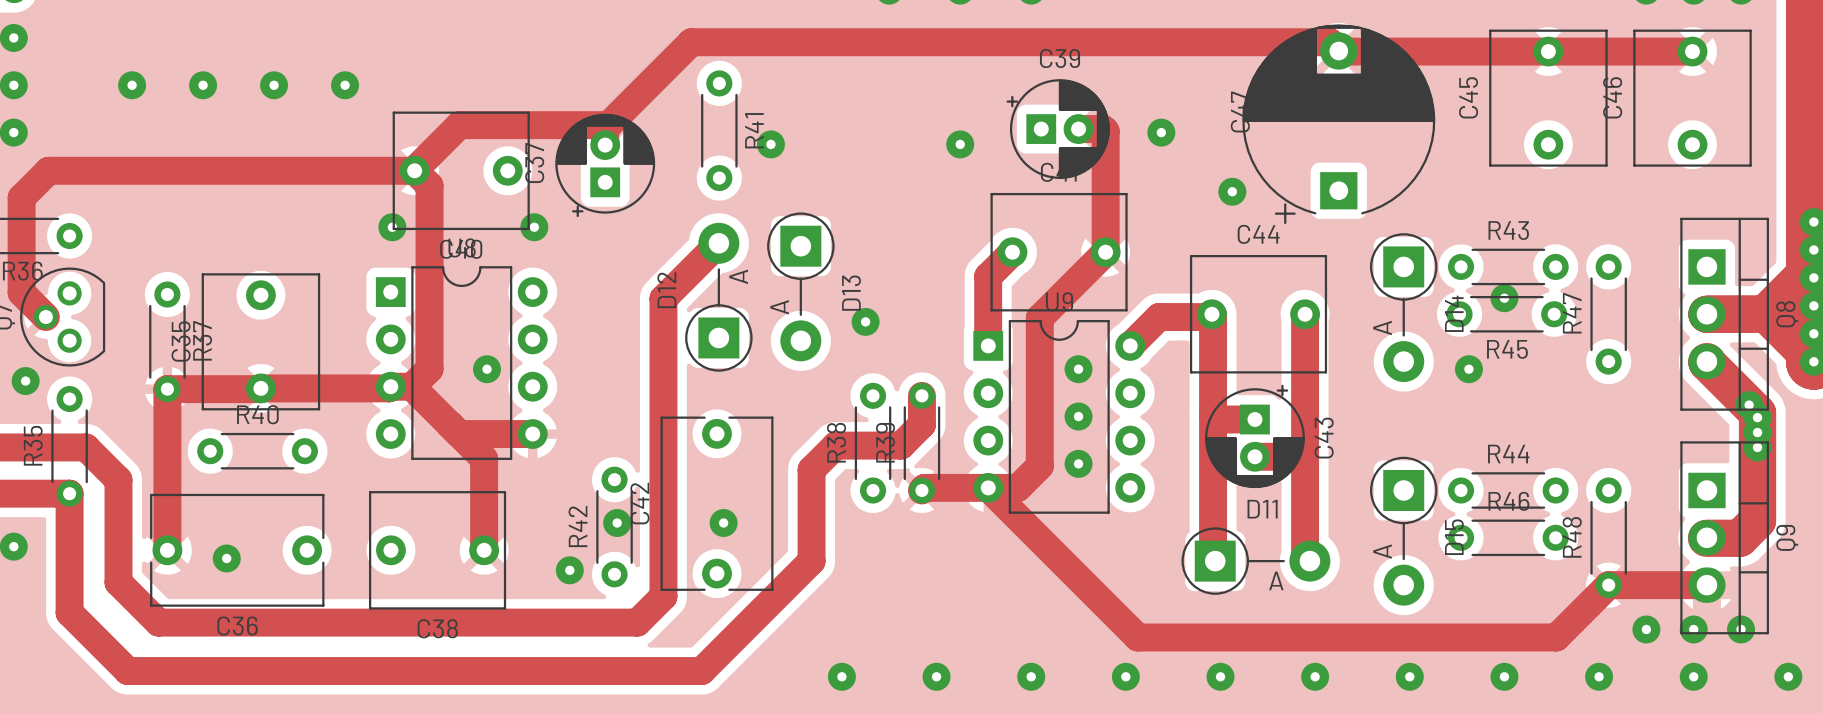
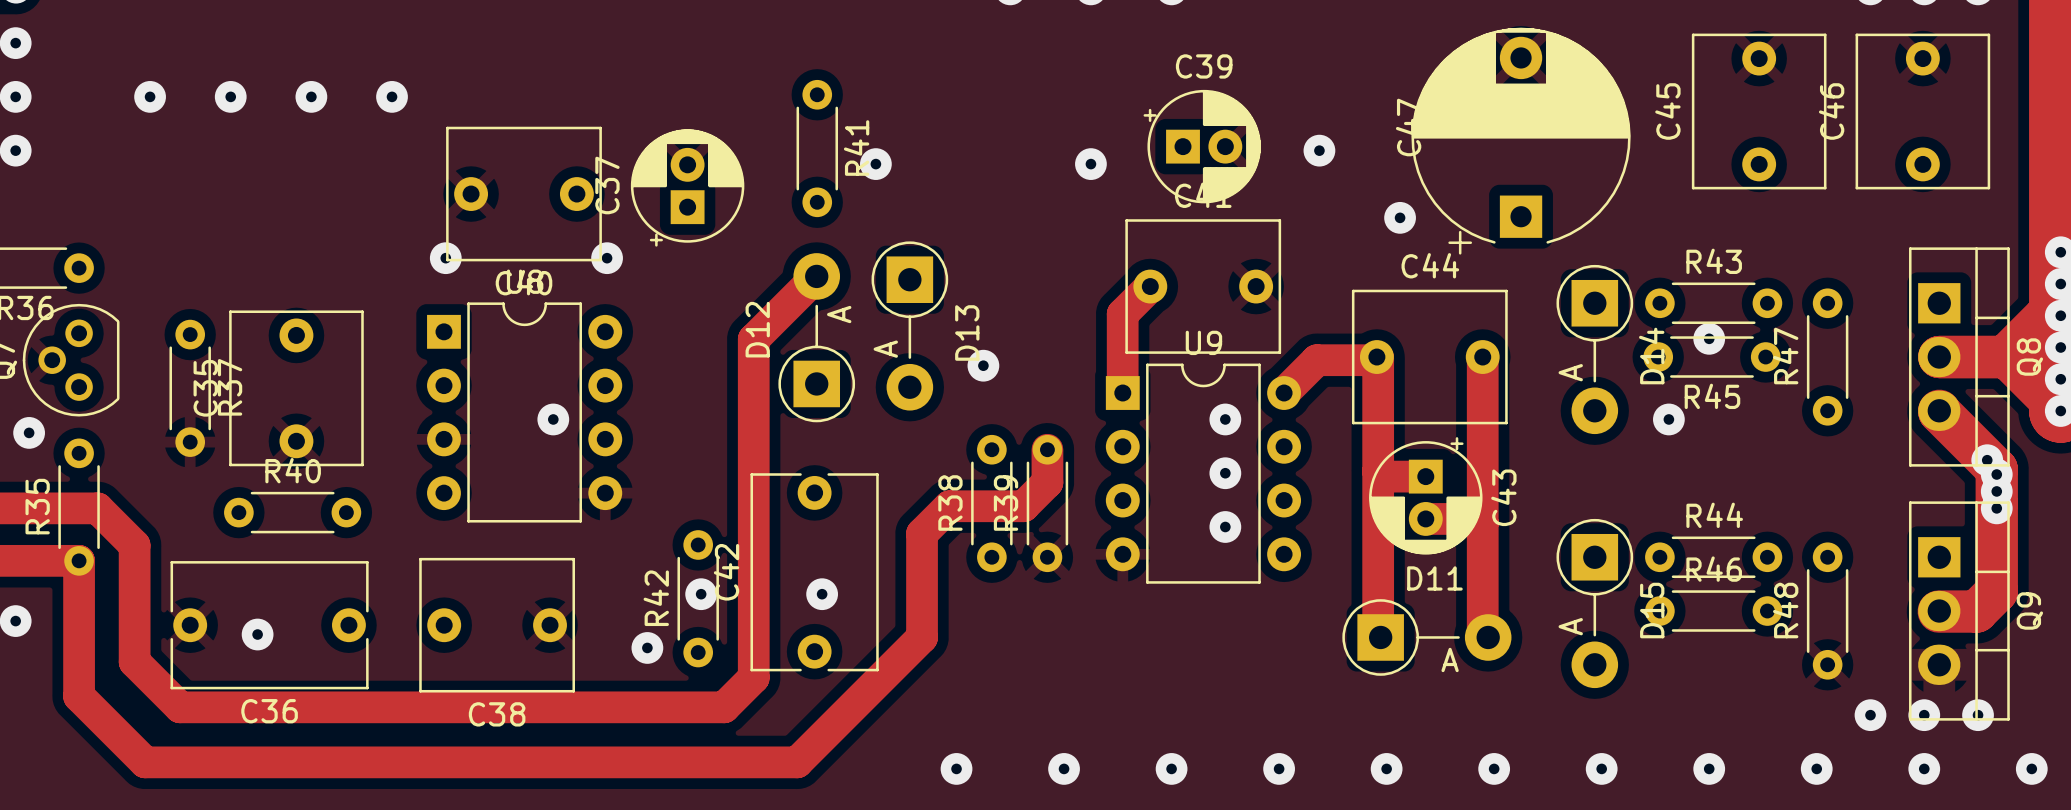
track: (1338, 51) (1330, 42) (691, 42) (605, 128) (605, 145) -> none
track: (1339, 51) (1692, 51) -> none
track: (608, 125) (459, 125) (414, 170) -> none
track: (1079, 129) (1103, 129) (1105, 131) (1105, 252) (1039, 318) (1039, 466) (1017, 487) (924, 487) (921, 490) -> none
track: (414, 170) (429, 185) (429, 369) (411, 386) -> none
track: (414, 170) (48, 170) (21, 197) (21, 292) (45, 317) -> none
track: (411, 386) (484, 458) (484, 550) -> none
track: (411, 386) (167, 389) (167, 550) -> none
track: (459, 434) (532, 434) -> none
track: (988, 487) (1137, 637) (1556, 637) (1608, 585) (1706, 585) -> none

